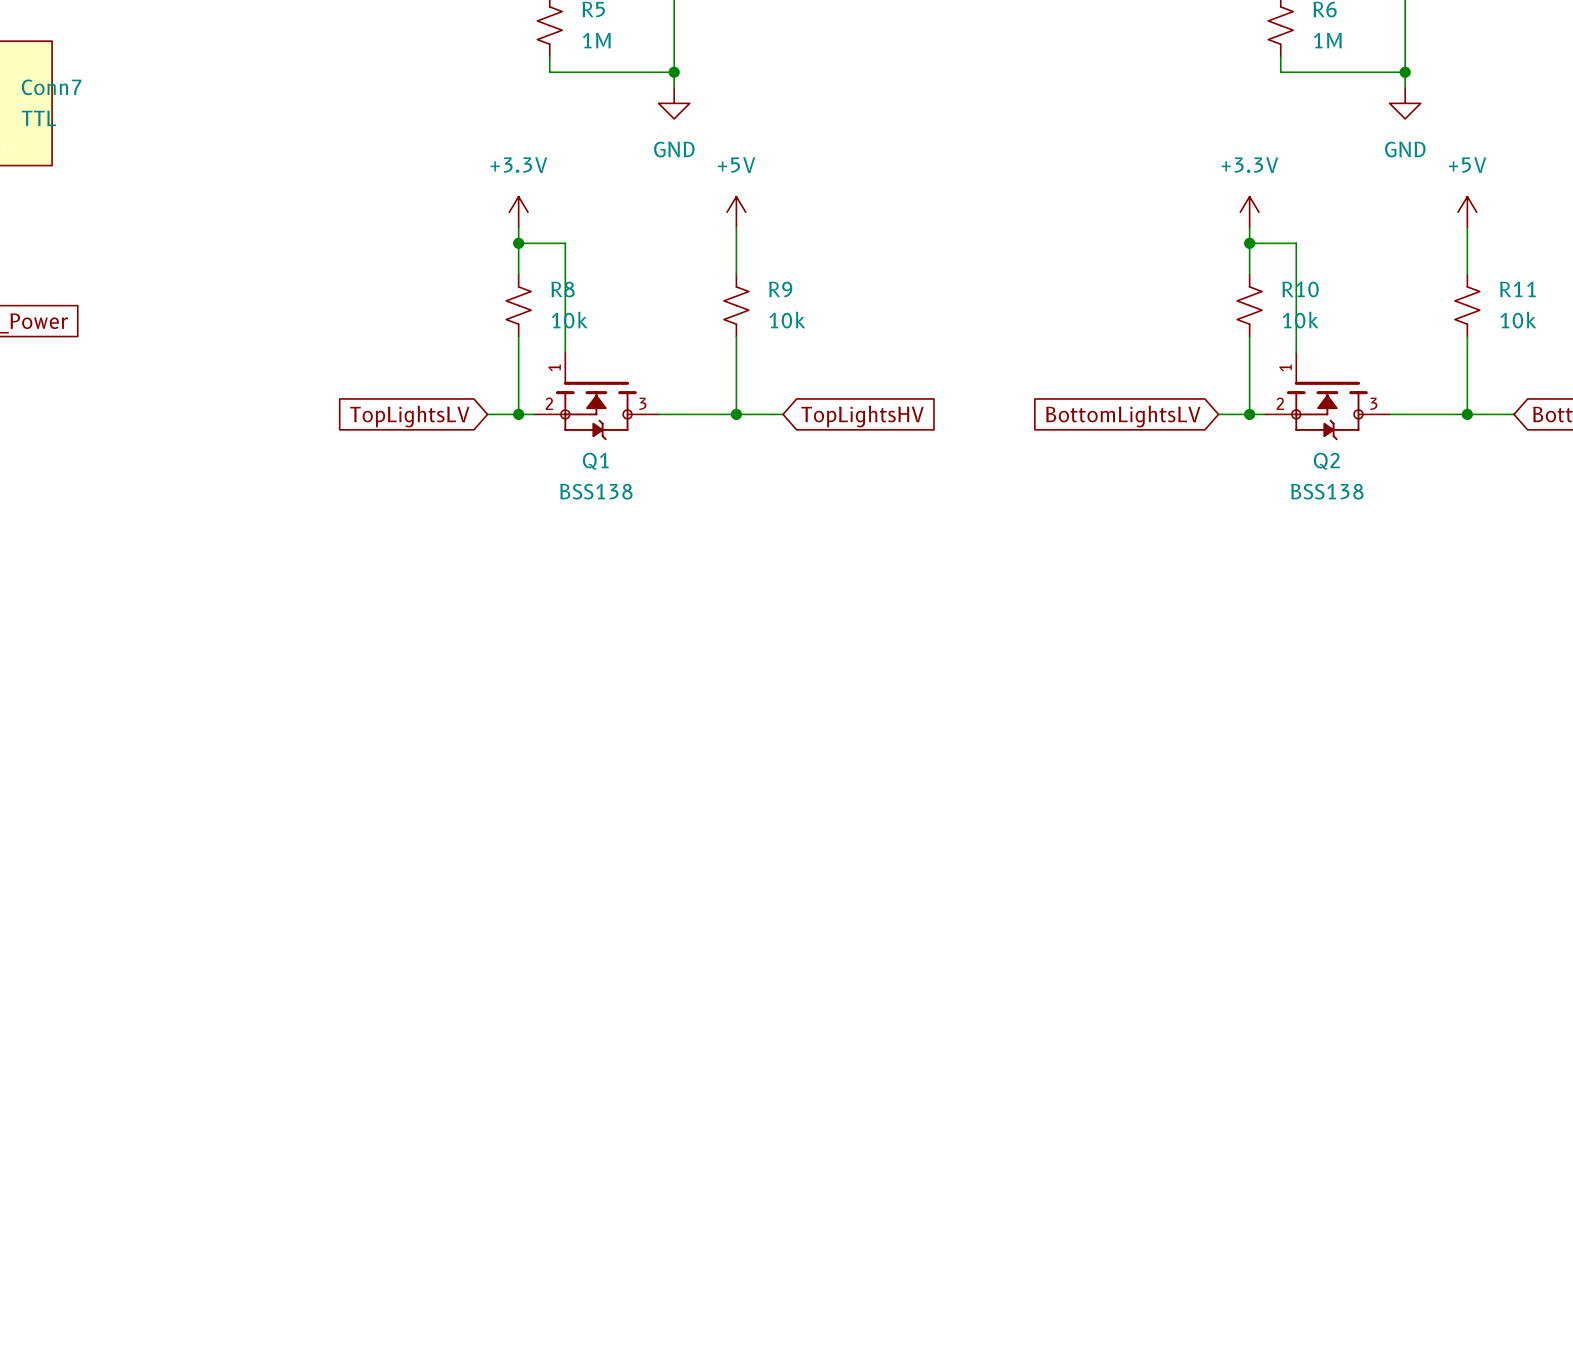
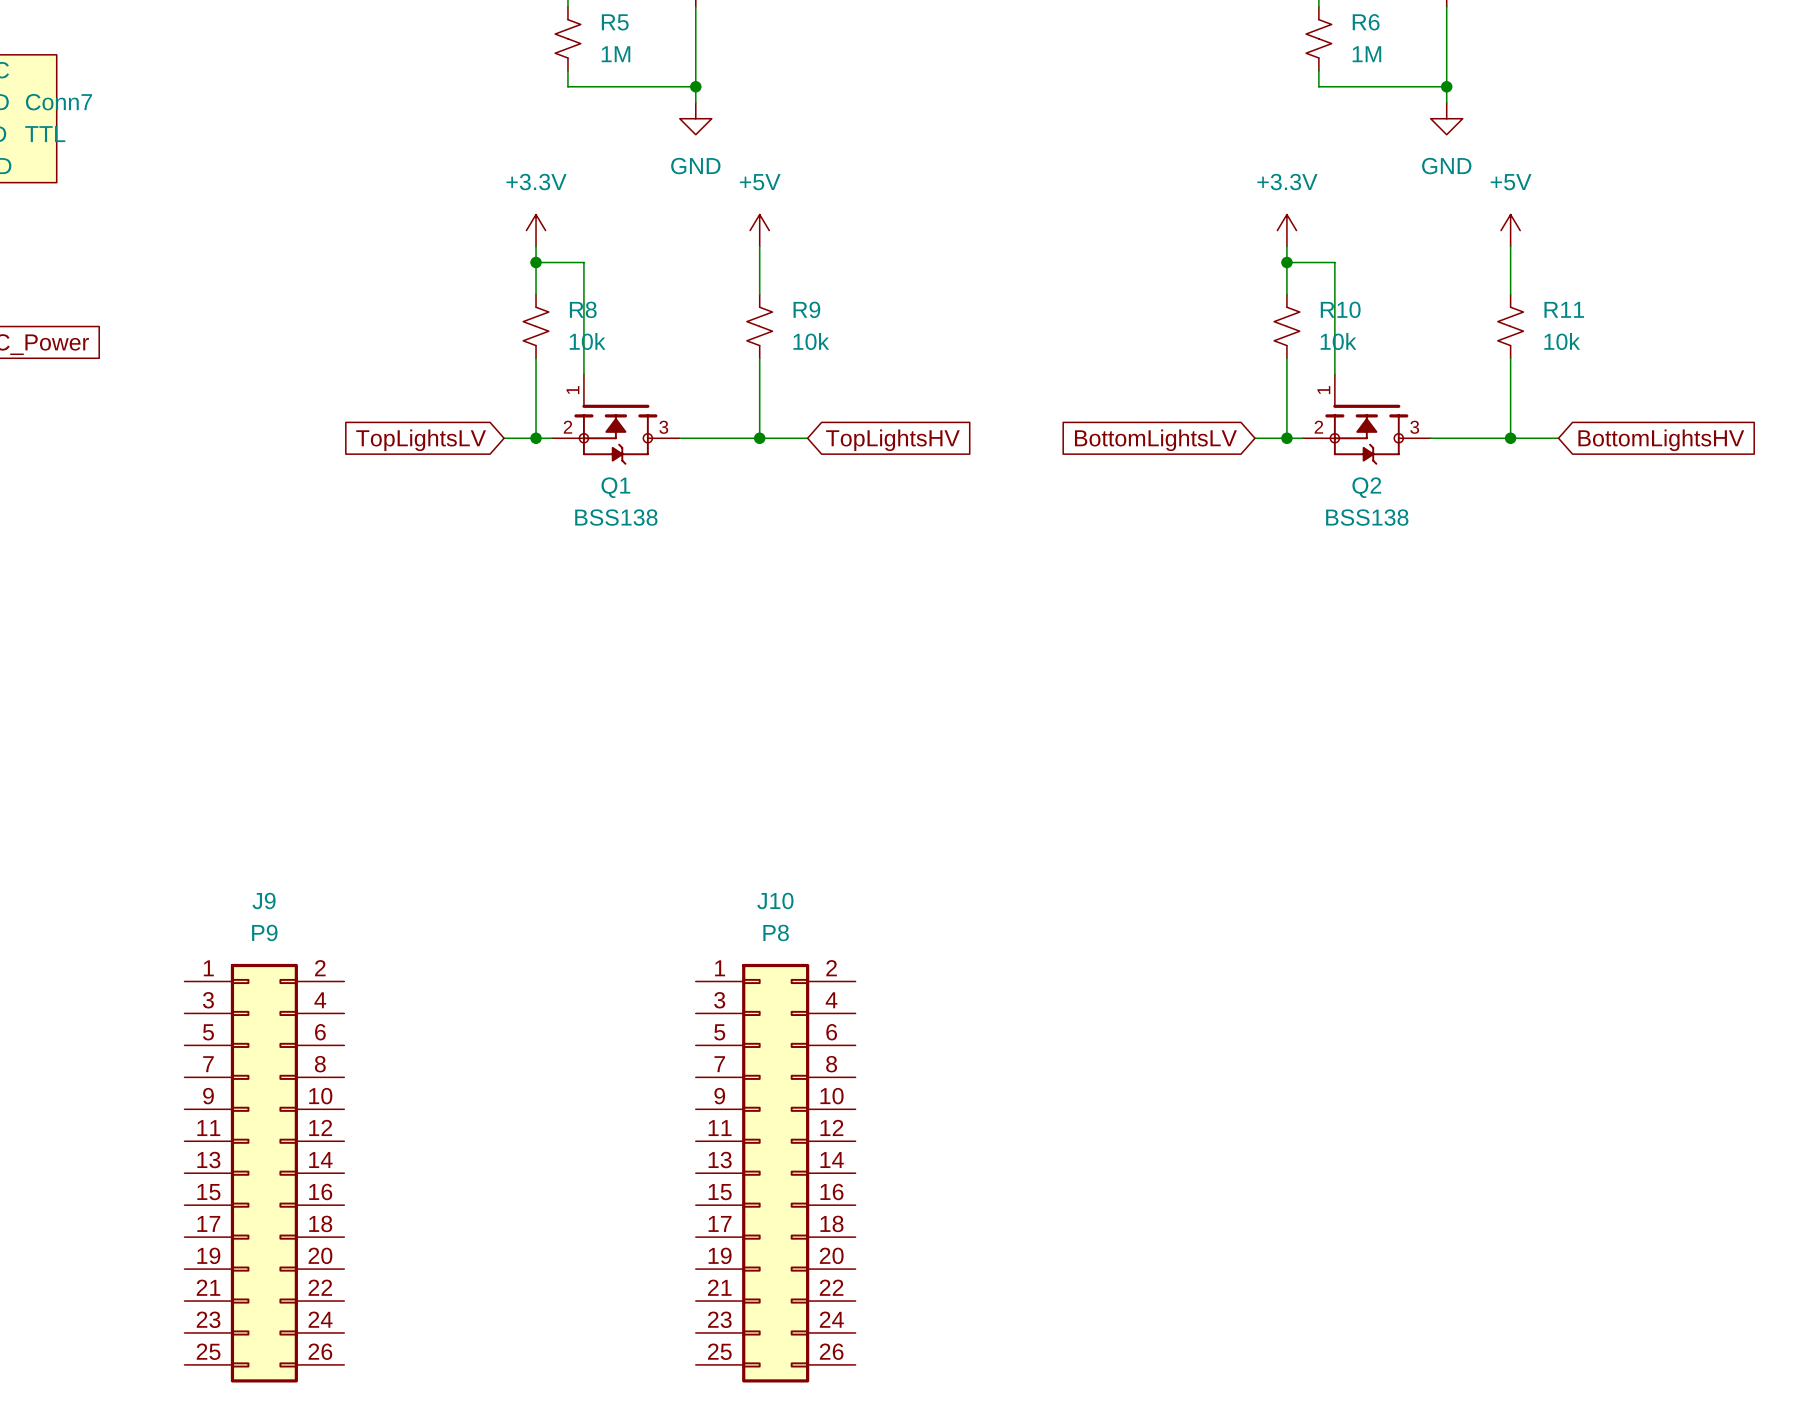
J9: none -> P9 (264, 1173)
J10: none -> P8 (775, 1173)

